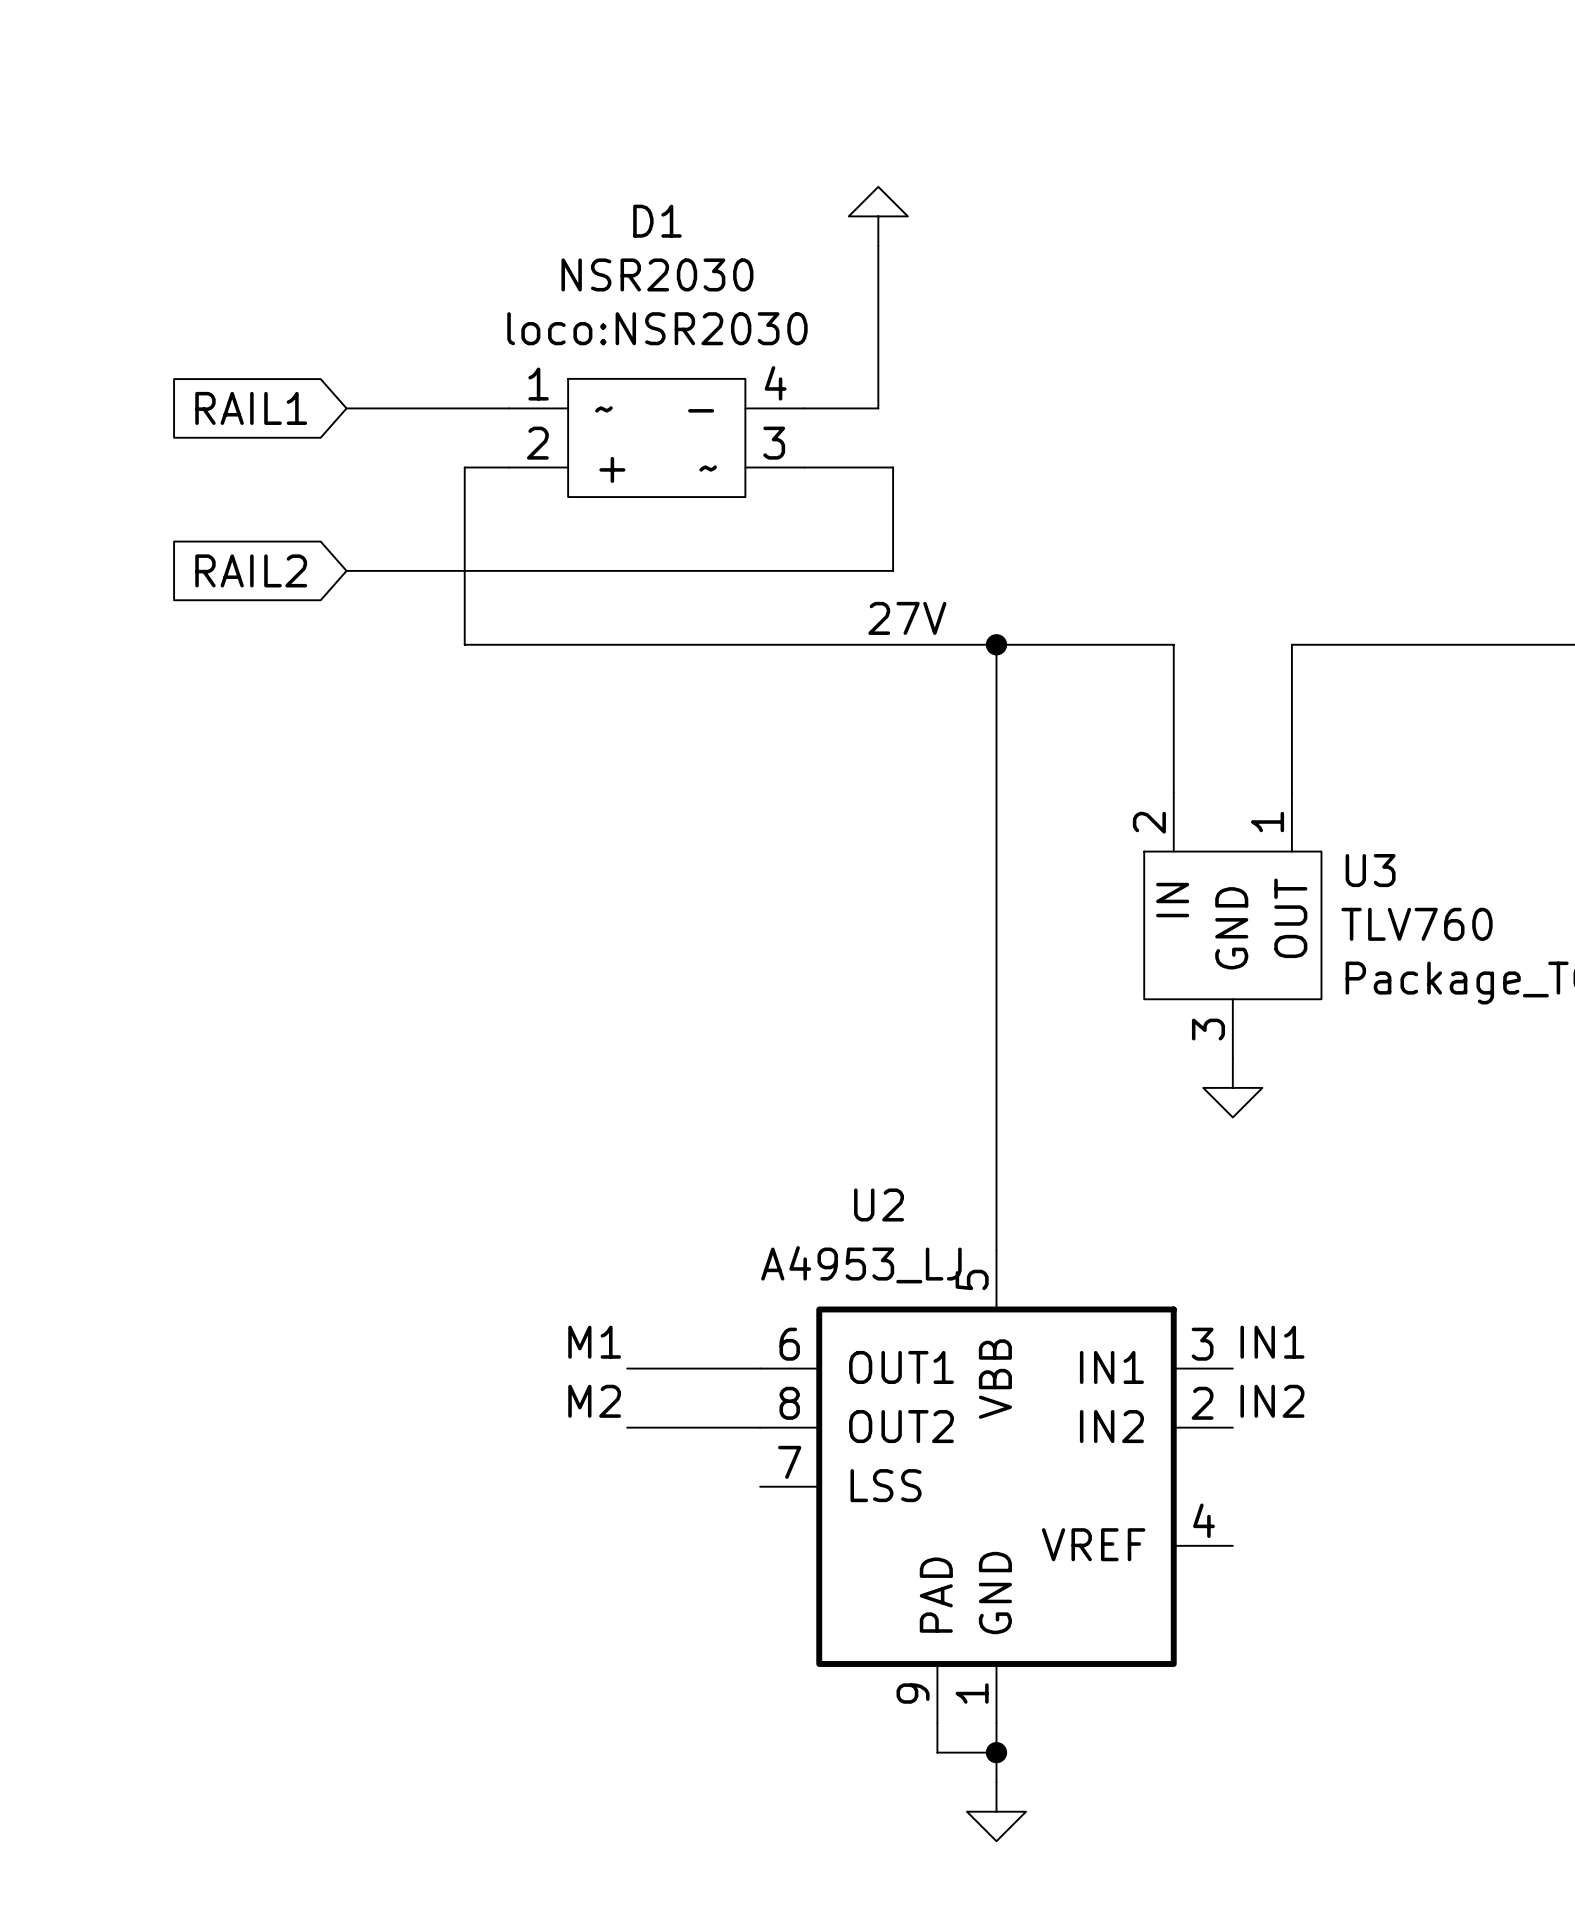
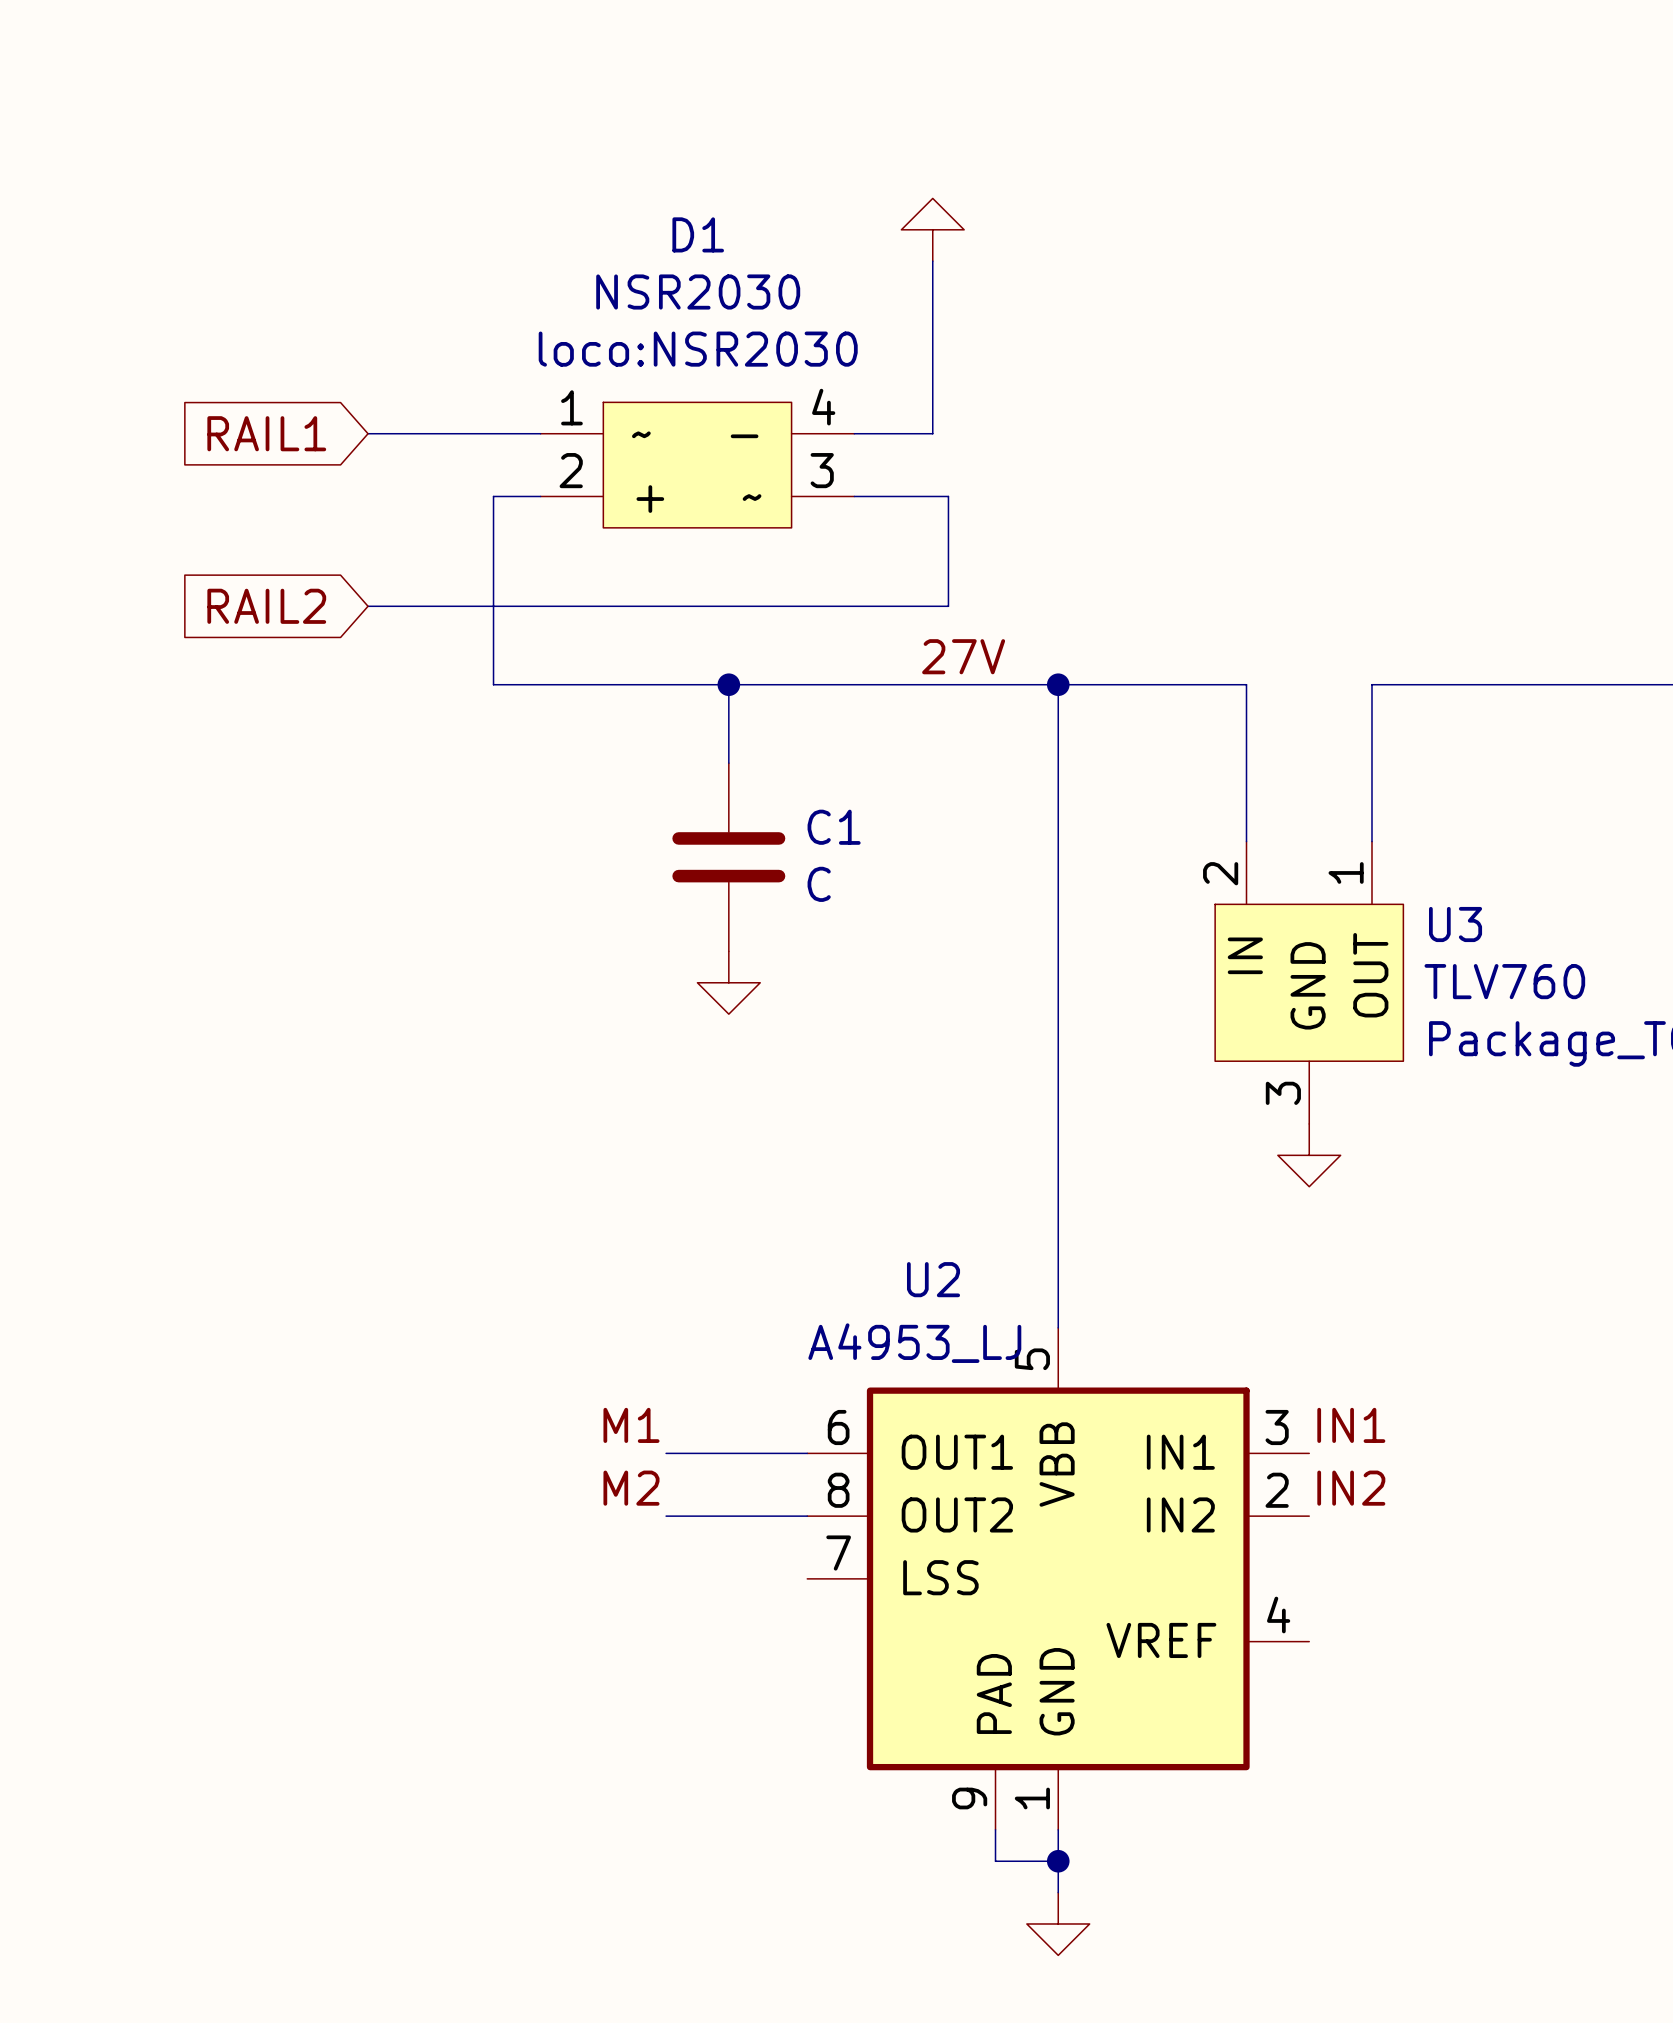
wire: none -> (728, 684) (728, 763)
junction: none -> (728, 684)
C1: none -> C (728, 857)
power symbol: none -> (728, 982)

